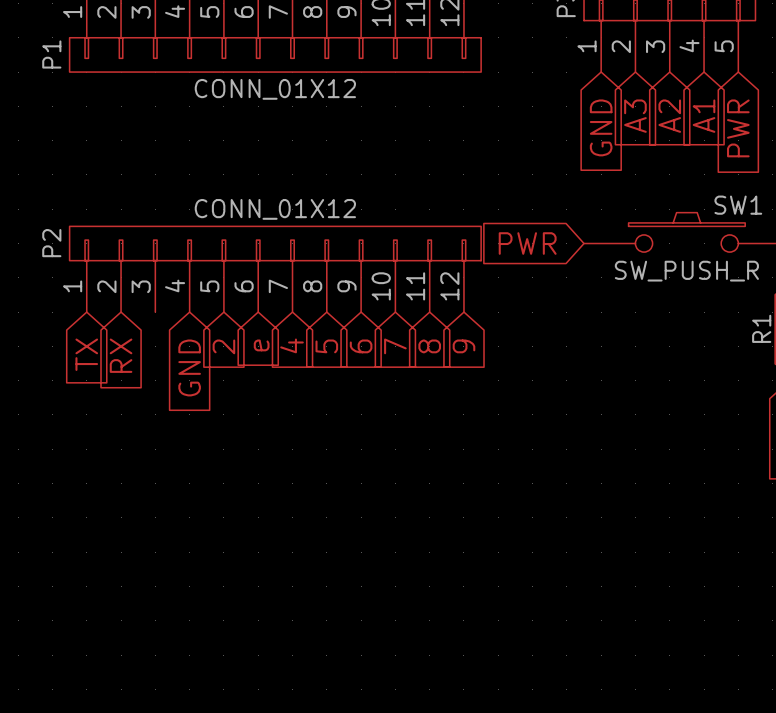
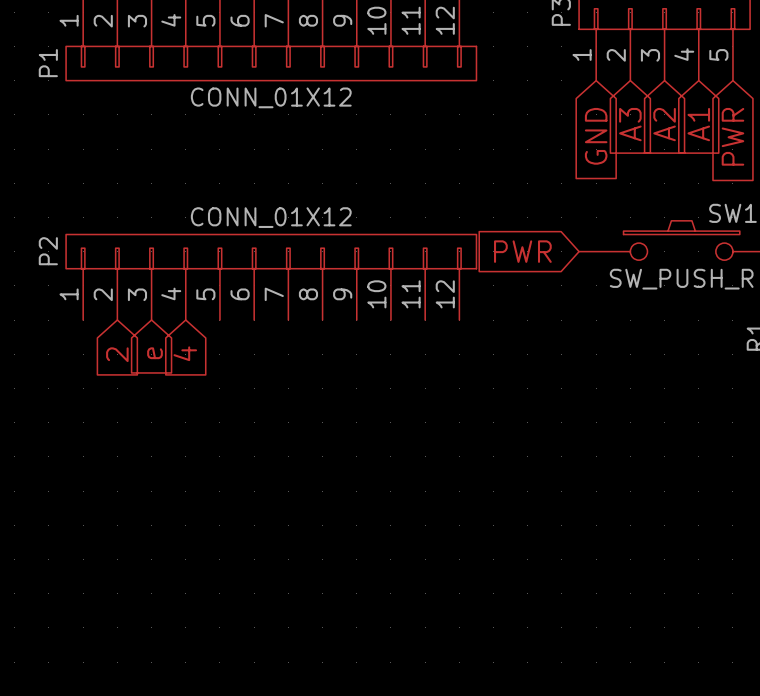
global label position: e (261, 345) -> e (154, 353)
global label: 4 (292, 345) -> none
global label: 2 (223, 346) -> none
global label: 5 (326, 346) -> none
global label: 6 (361, 346) -> none
global label: 7 (395, 346) -> none
global label: 8 (429, 346) -> none
global label: 9 (463, 346) -> none
global label: TX (86, 354) -> none
global label: RX (121, 355) -> 2 (117, 354)
global label: GND (189, 367) -> 4 (185, 353)

